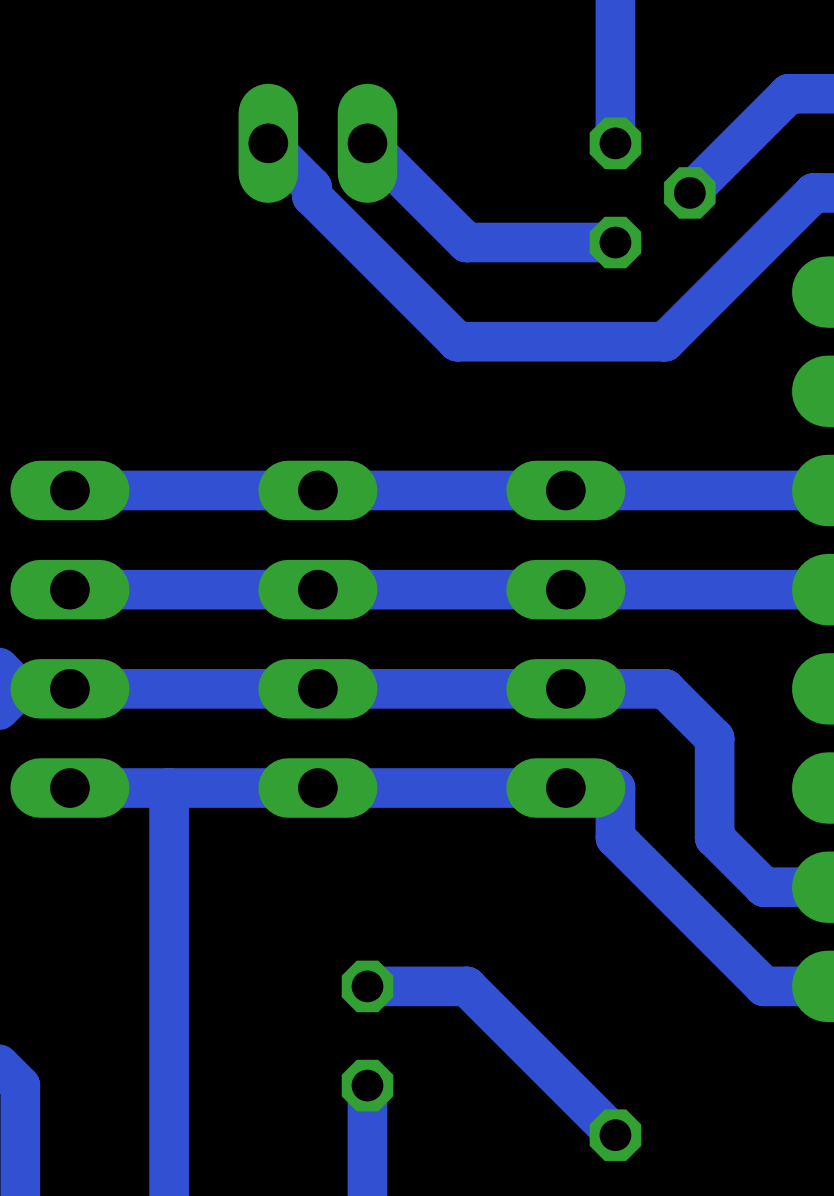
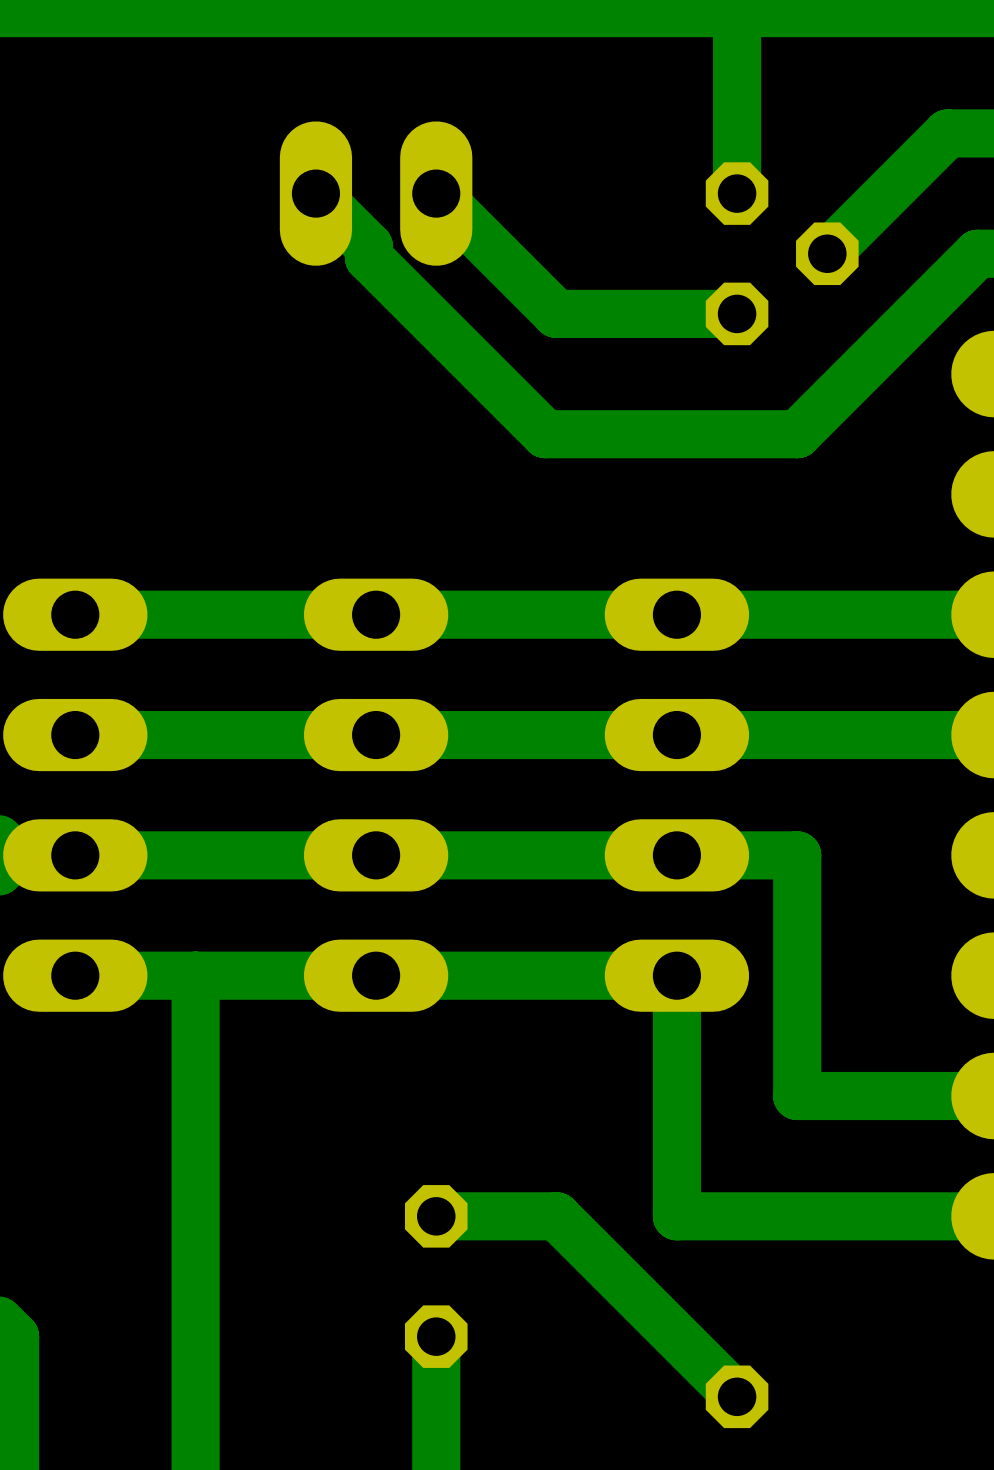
track: (665, 688) (714, 738) (714, 837) (764, 887) -> (797, 855) (797, 1096) (917, 1096)
track: (565, 788) (615, 788) (615, 837) (764, 986) -> (676, 975) (676, 1216) (917, 1216)

